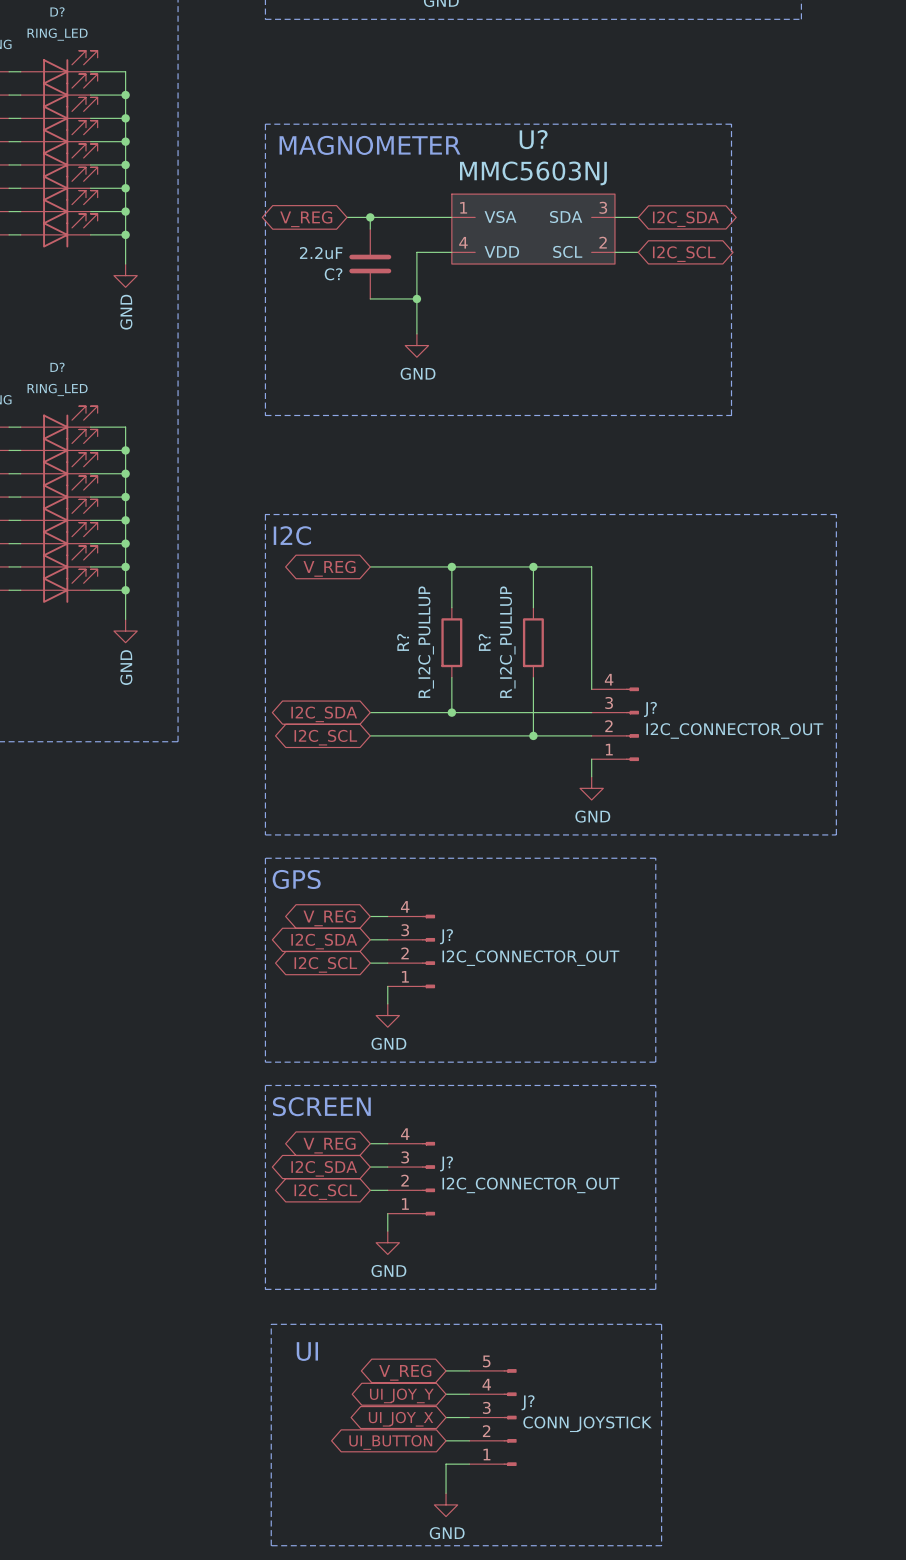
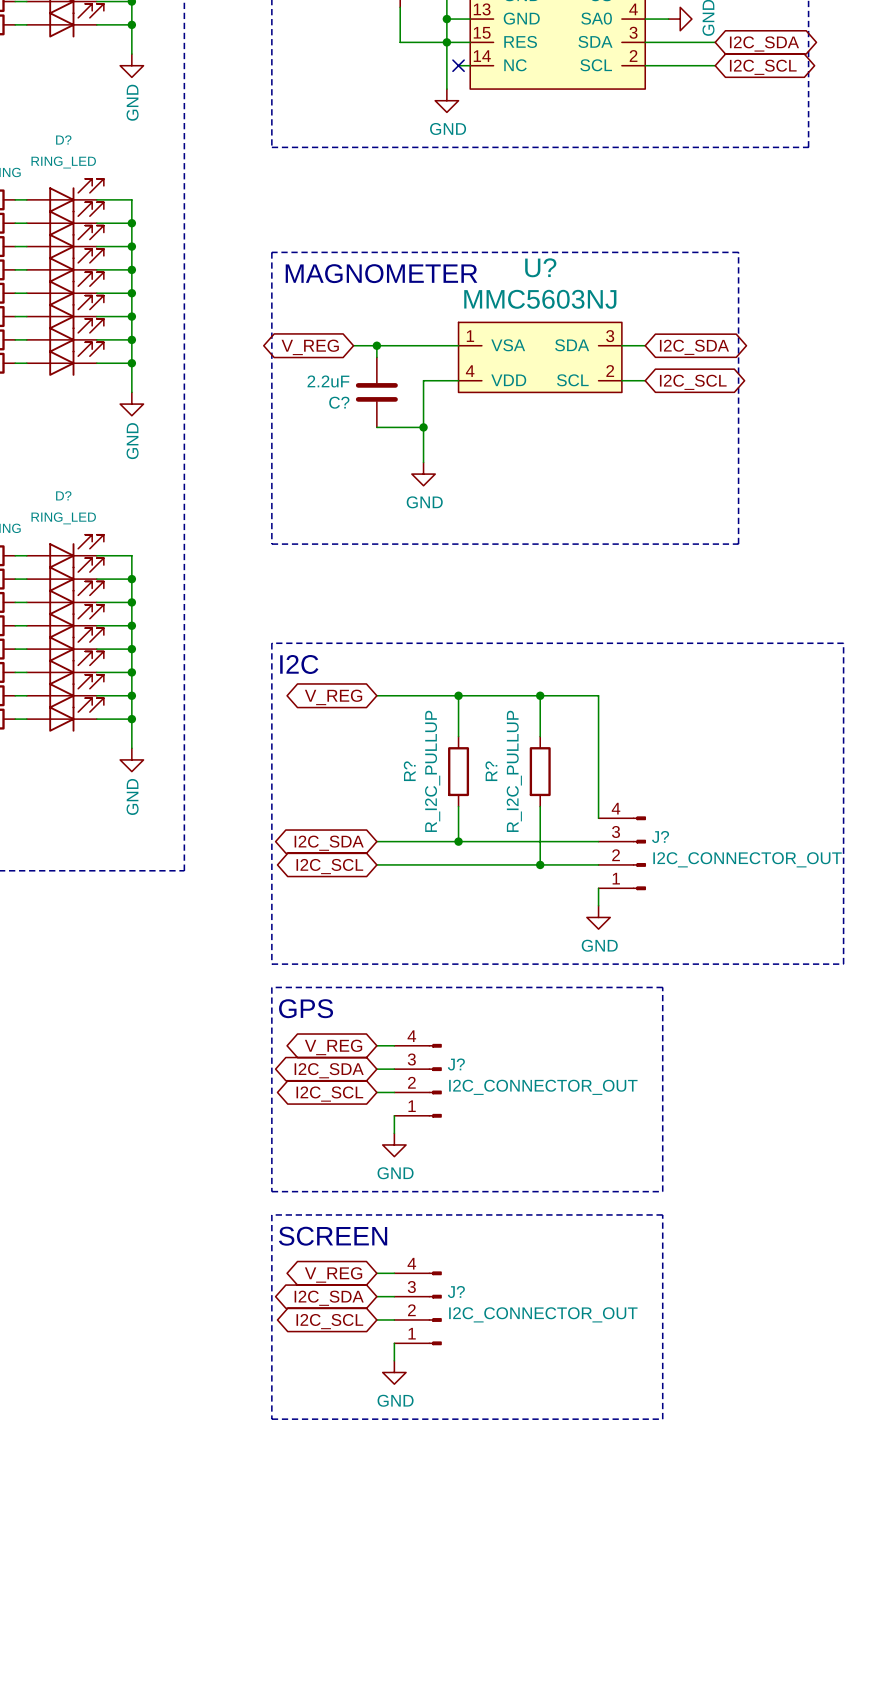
line: (271, 1324) (661, 1324) (661, 1545) (271, 1545) (271, 1324) -> none
text: UI (307, 1351) -> none
wire: (446, 1370) (469, 1370) -> none
global label: V_REG (405, 1372) -> none
wire: (446, 1394) (469, 1394) -> none
global label: UI_JOY_Y (401, 1395) -> none
wire: (446, 1417) (469, 1417) -> none
J?: CONN_JOYSTICK (492, 1417) -> none
global label: UI_JOY_X (401, 1419) -> none
wire: (446, 1440) (469, 1440) -> none
global label: UI_BUTTON (390, 1442) -> none
wire: (469, 1464) (446, 1464) (446, 1493) -> none
power symbol: GND (446, 1504) -> none

